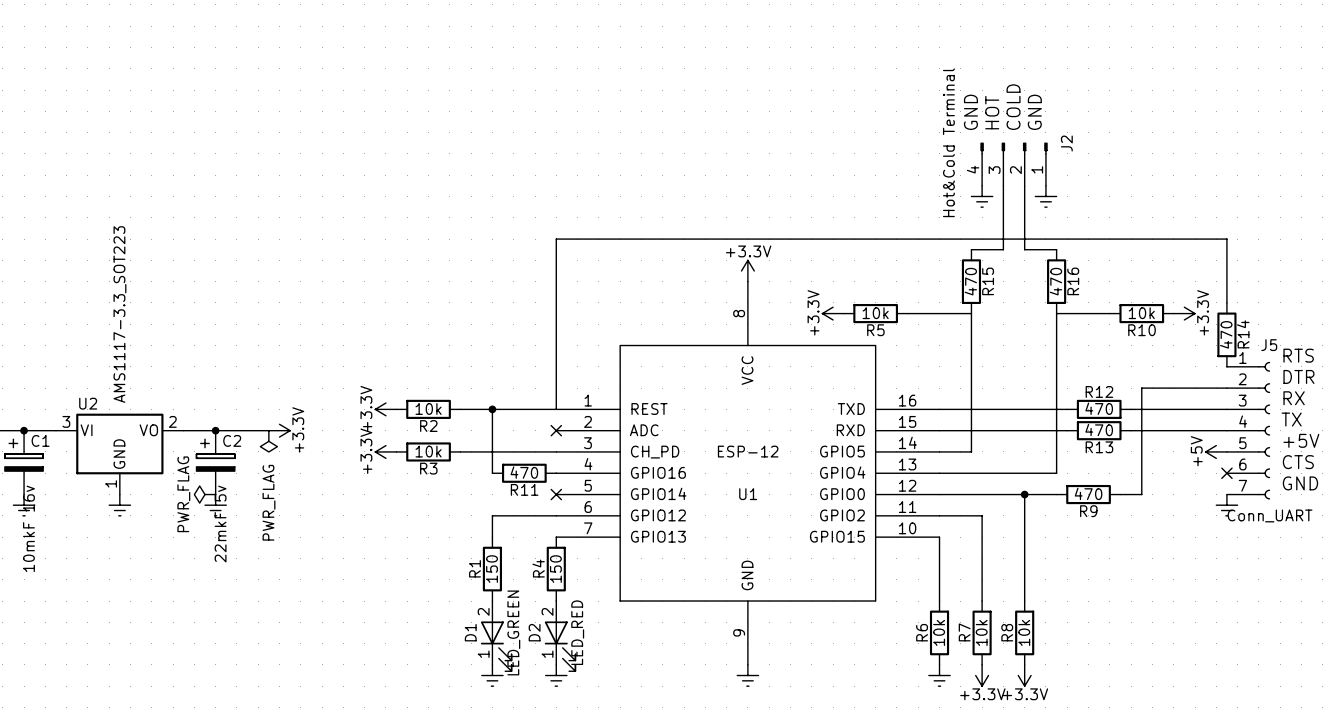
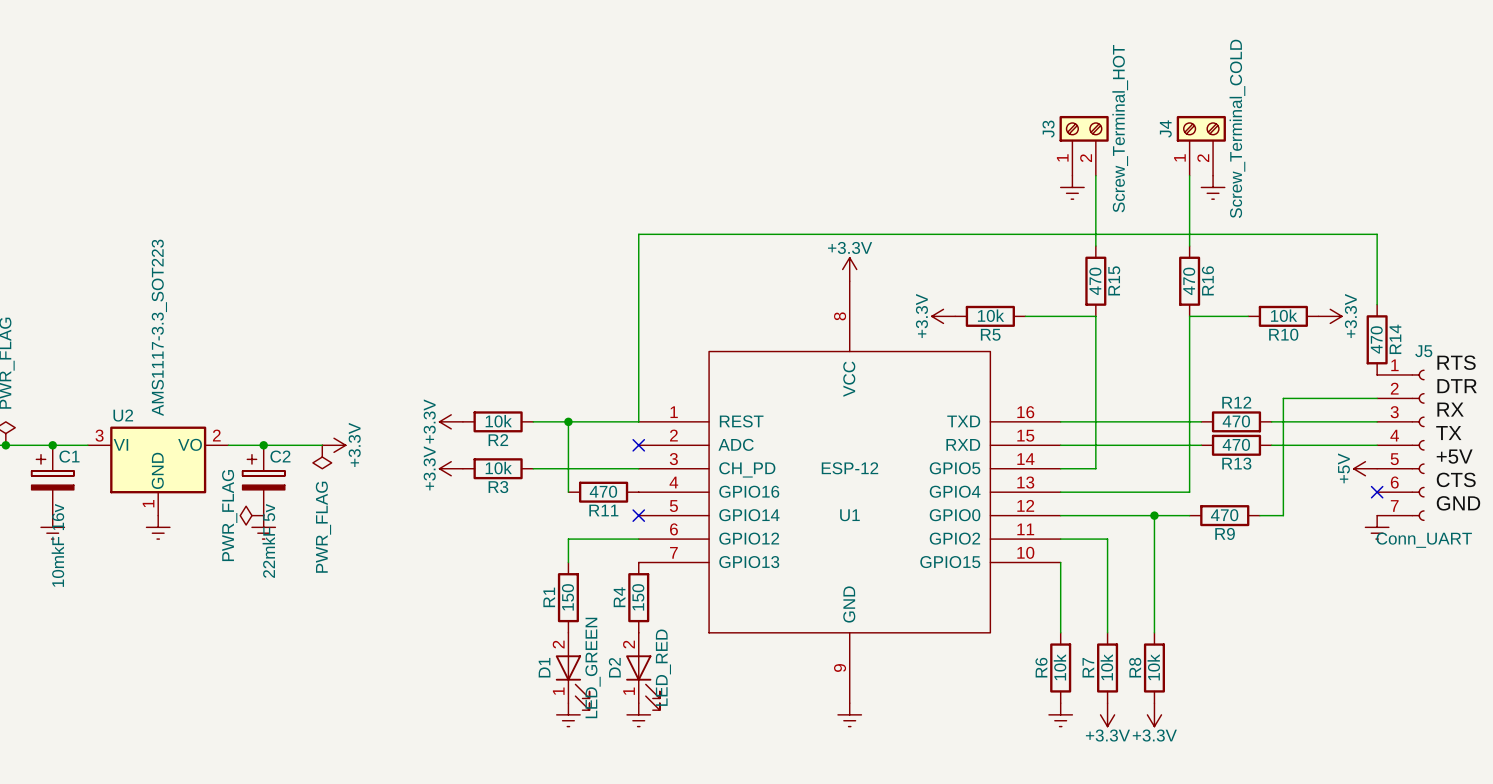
label: COLD (1013, 107) -> none
label: GND (970, 112) -> none
label: HOT (992, 112) -> none
label: GND (1034, 112) -> none
J3: none -> Screw_Terminal_HOT (1084, 145)
J4: none -> Screw_Terminal_COLD (1201, 145)
J2: Hot&Cold Terminal (1014, 164) -> none
wire: (1003, 185) (1003, 249) (971, 249) -> (1095, 175) (1095, 246)
wire: (1024, 185) (1024, 249) (1056, 249) -> (1189, 175) (1189, 246)
power symbol position: (982, 196) -> (1072, 187)
power symbol position: (1045, 196) -> (1213, 187)

